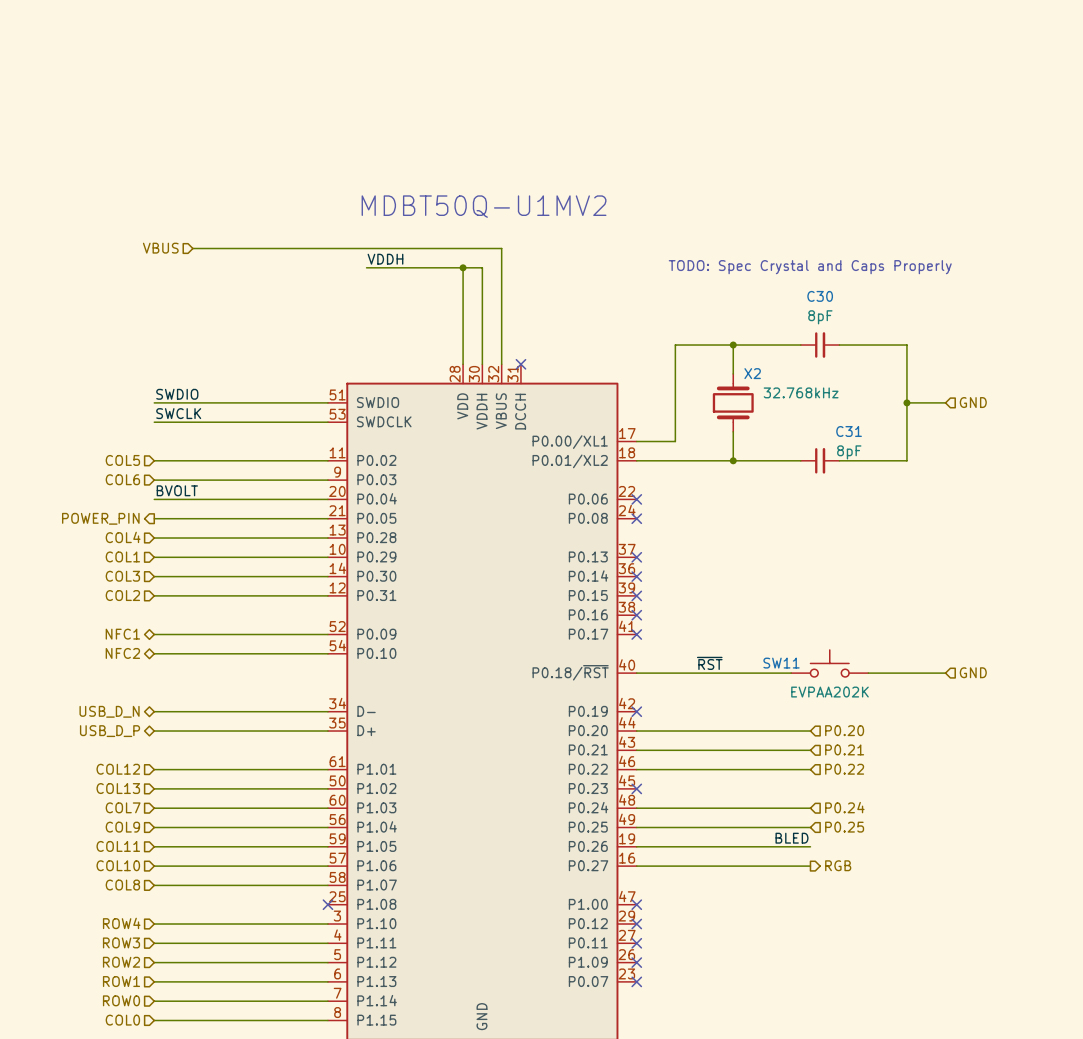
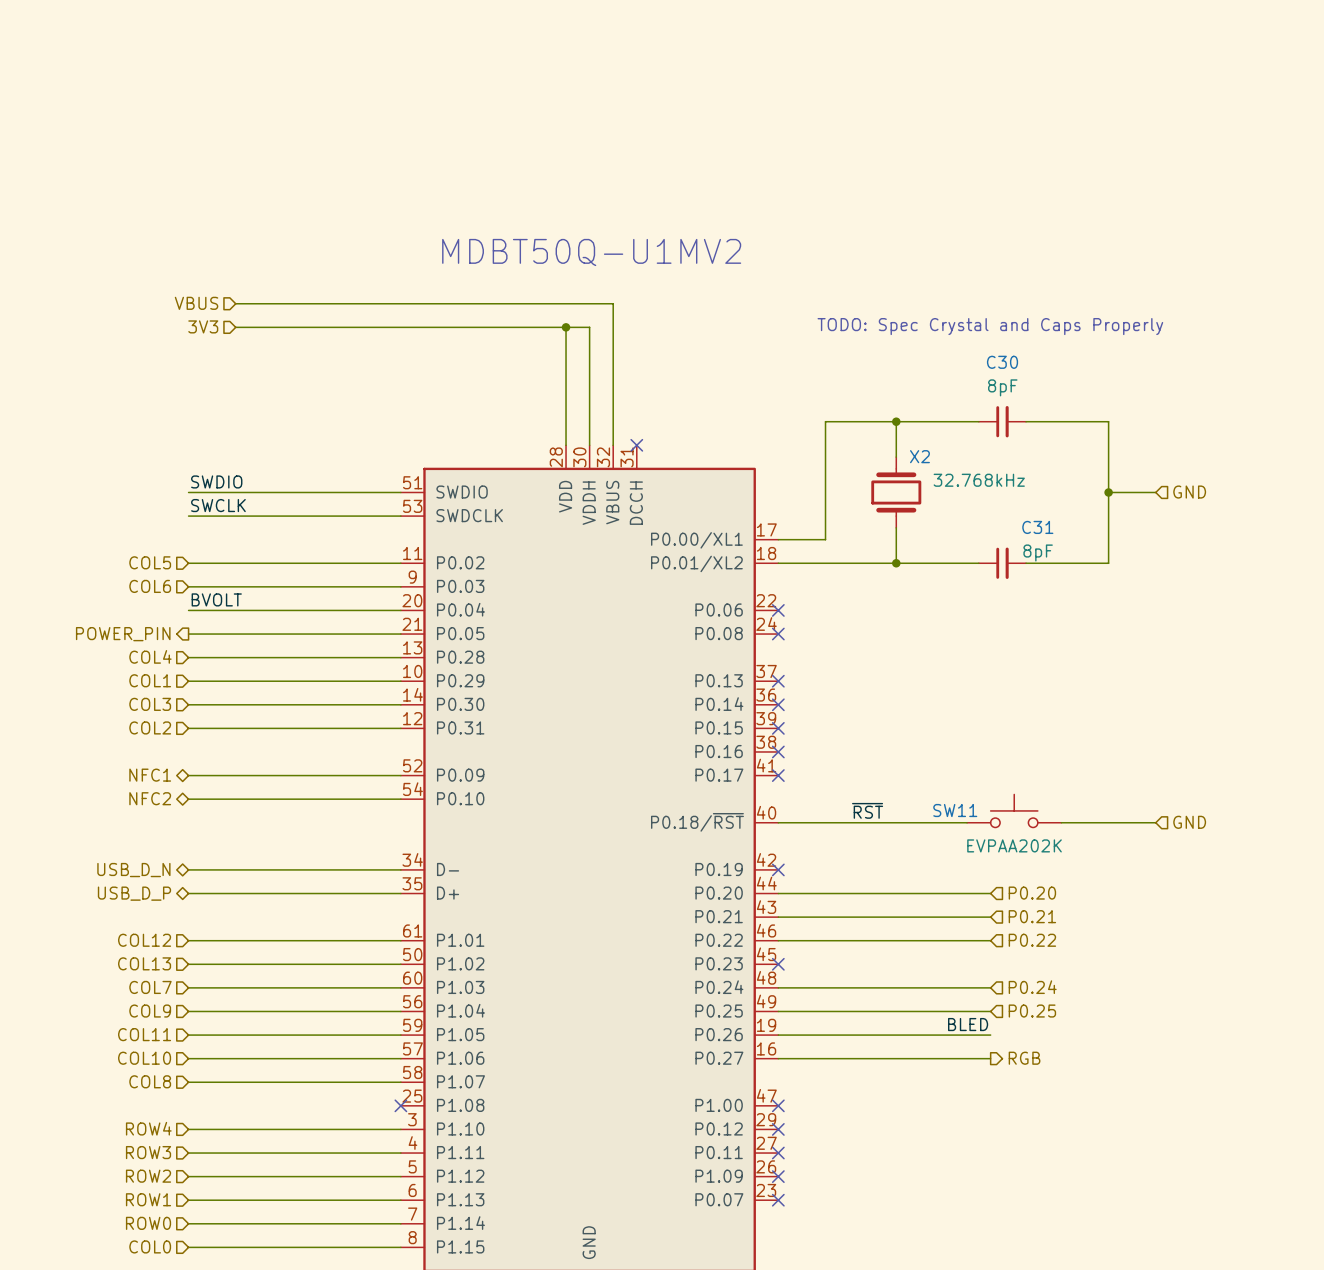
label: VDDH (385, 259) -> none
hierarchical label: none -> 3V3 (203, 326)
wire: none -> (235, 327) (448, 327)

